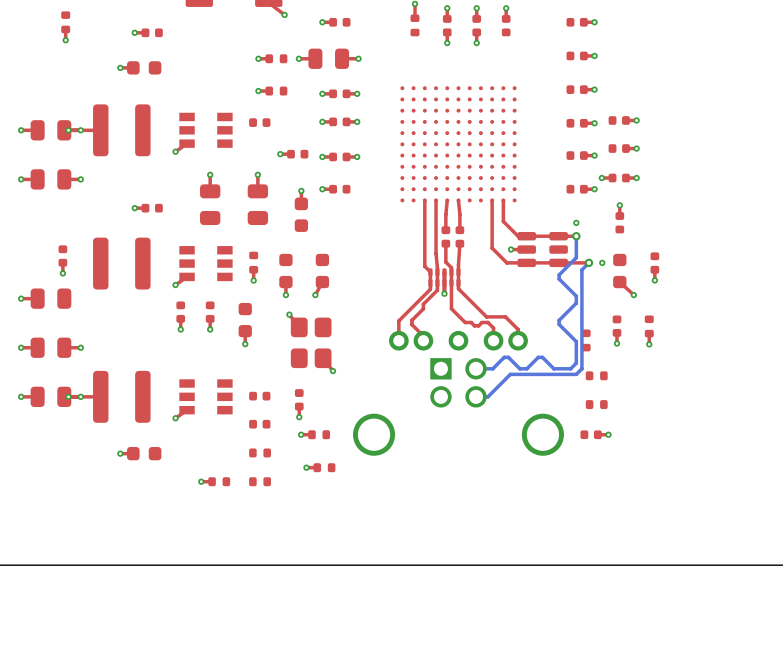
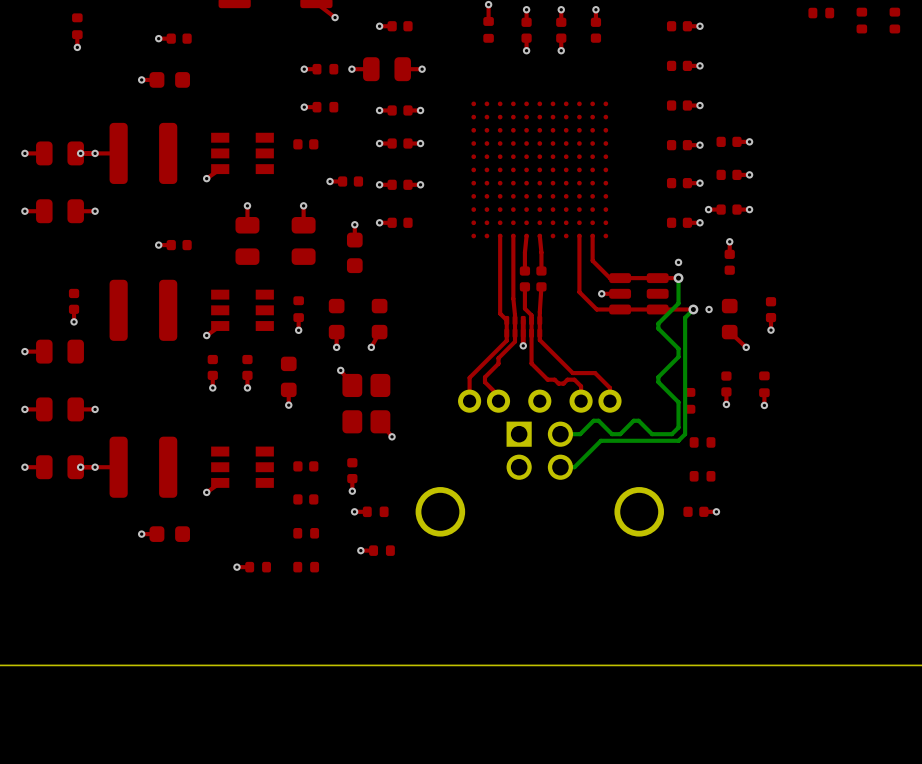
part: none -> (821, 13)
part: none -> (861, 20)
part: none -> (894, 20)

